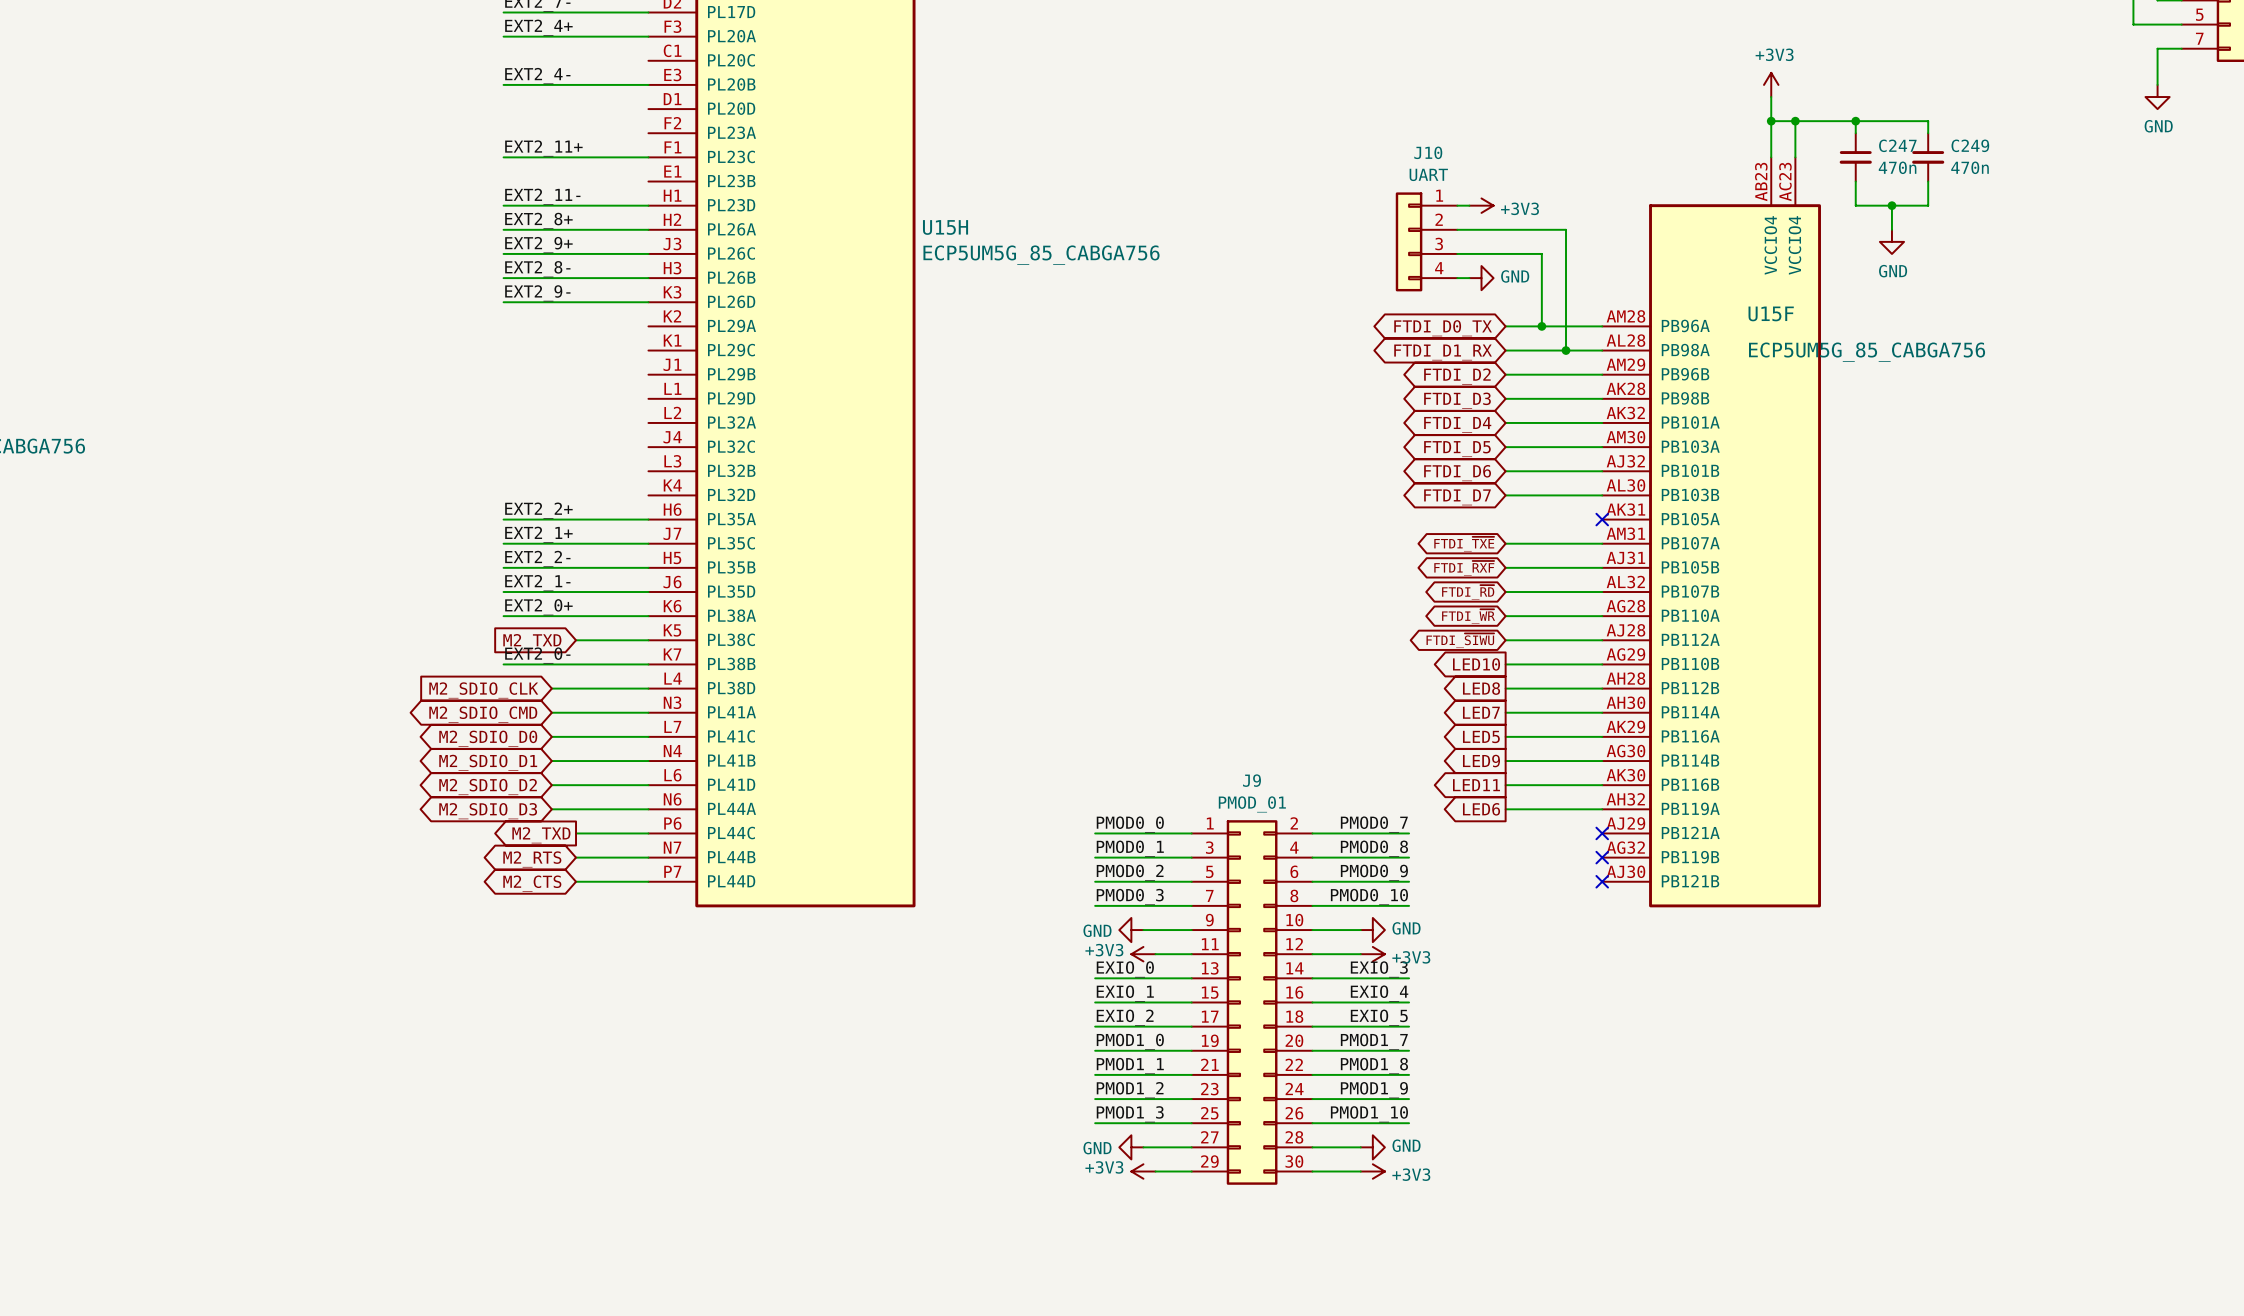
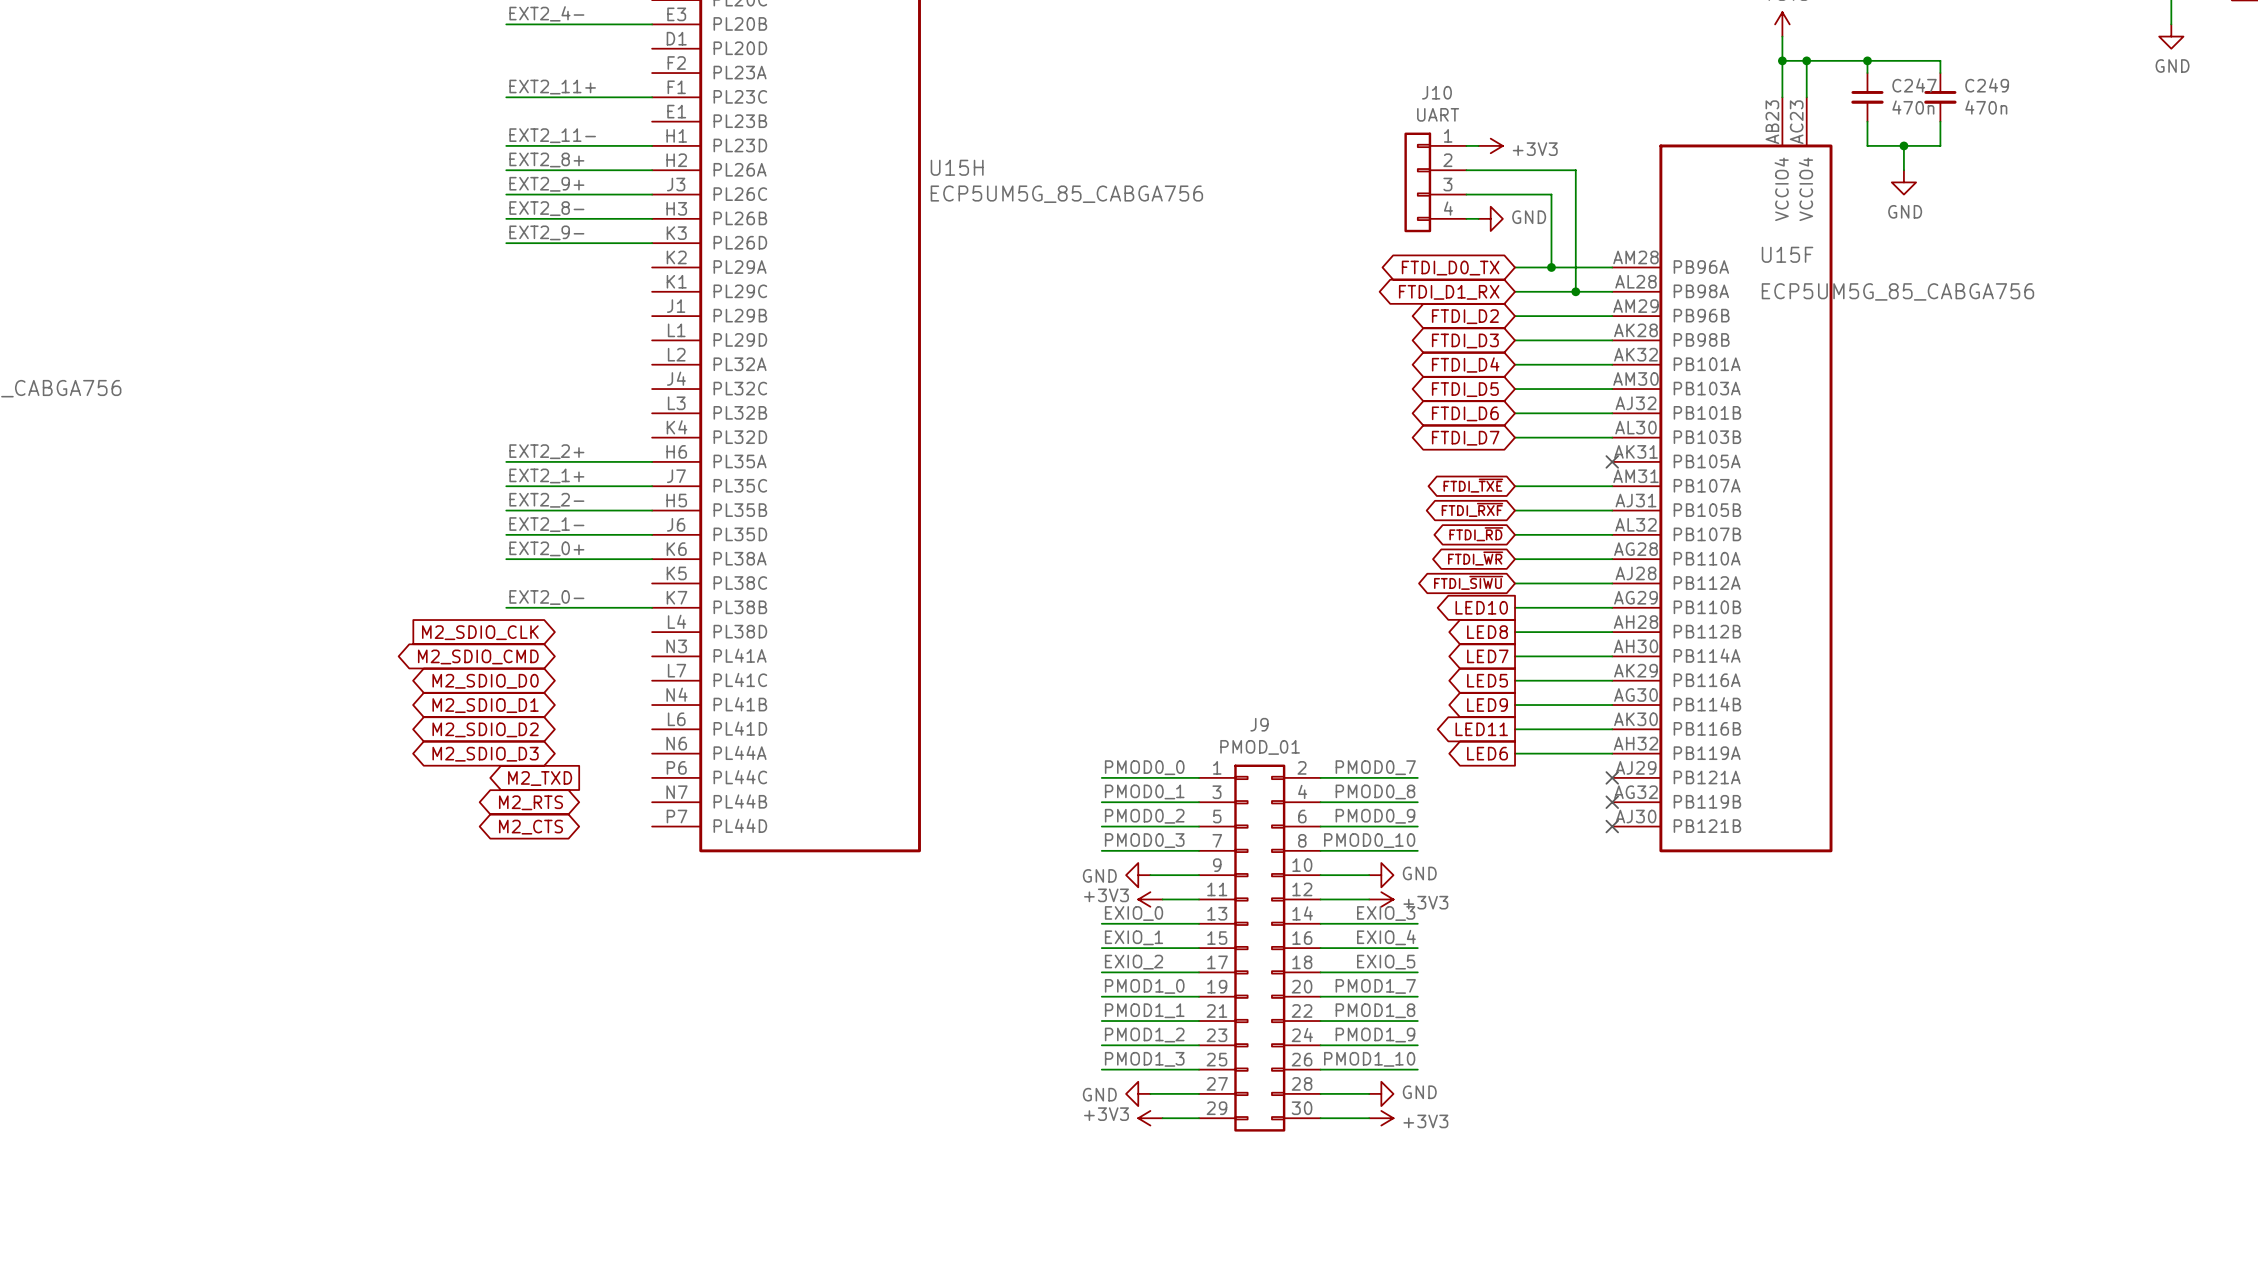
wire: (576, 640) (648, 640) -> none
global label: M2_TXD (532, 642) -> none
wire: (551, 688) (648, 688) -> none
wire: (551, 712) (648, 712) -> none
wire: (551, 736) (648, 736) -> none
wire: (551, 761) (648, 761) -> none
wire: (551, 785) (648, 785) -> none
wire: (551, 809) (648, 809) -> none
wire: (576, 833) (648, 833) -> none
wire: (576, 857) (648, 857) -> none
wire: (576, 881) (648, 881) -> none

